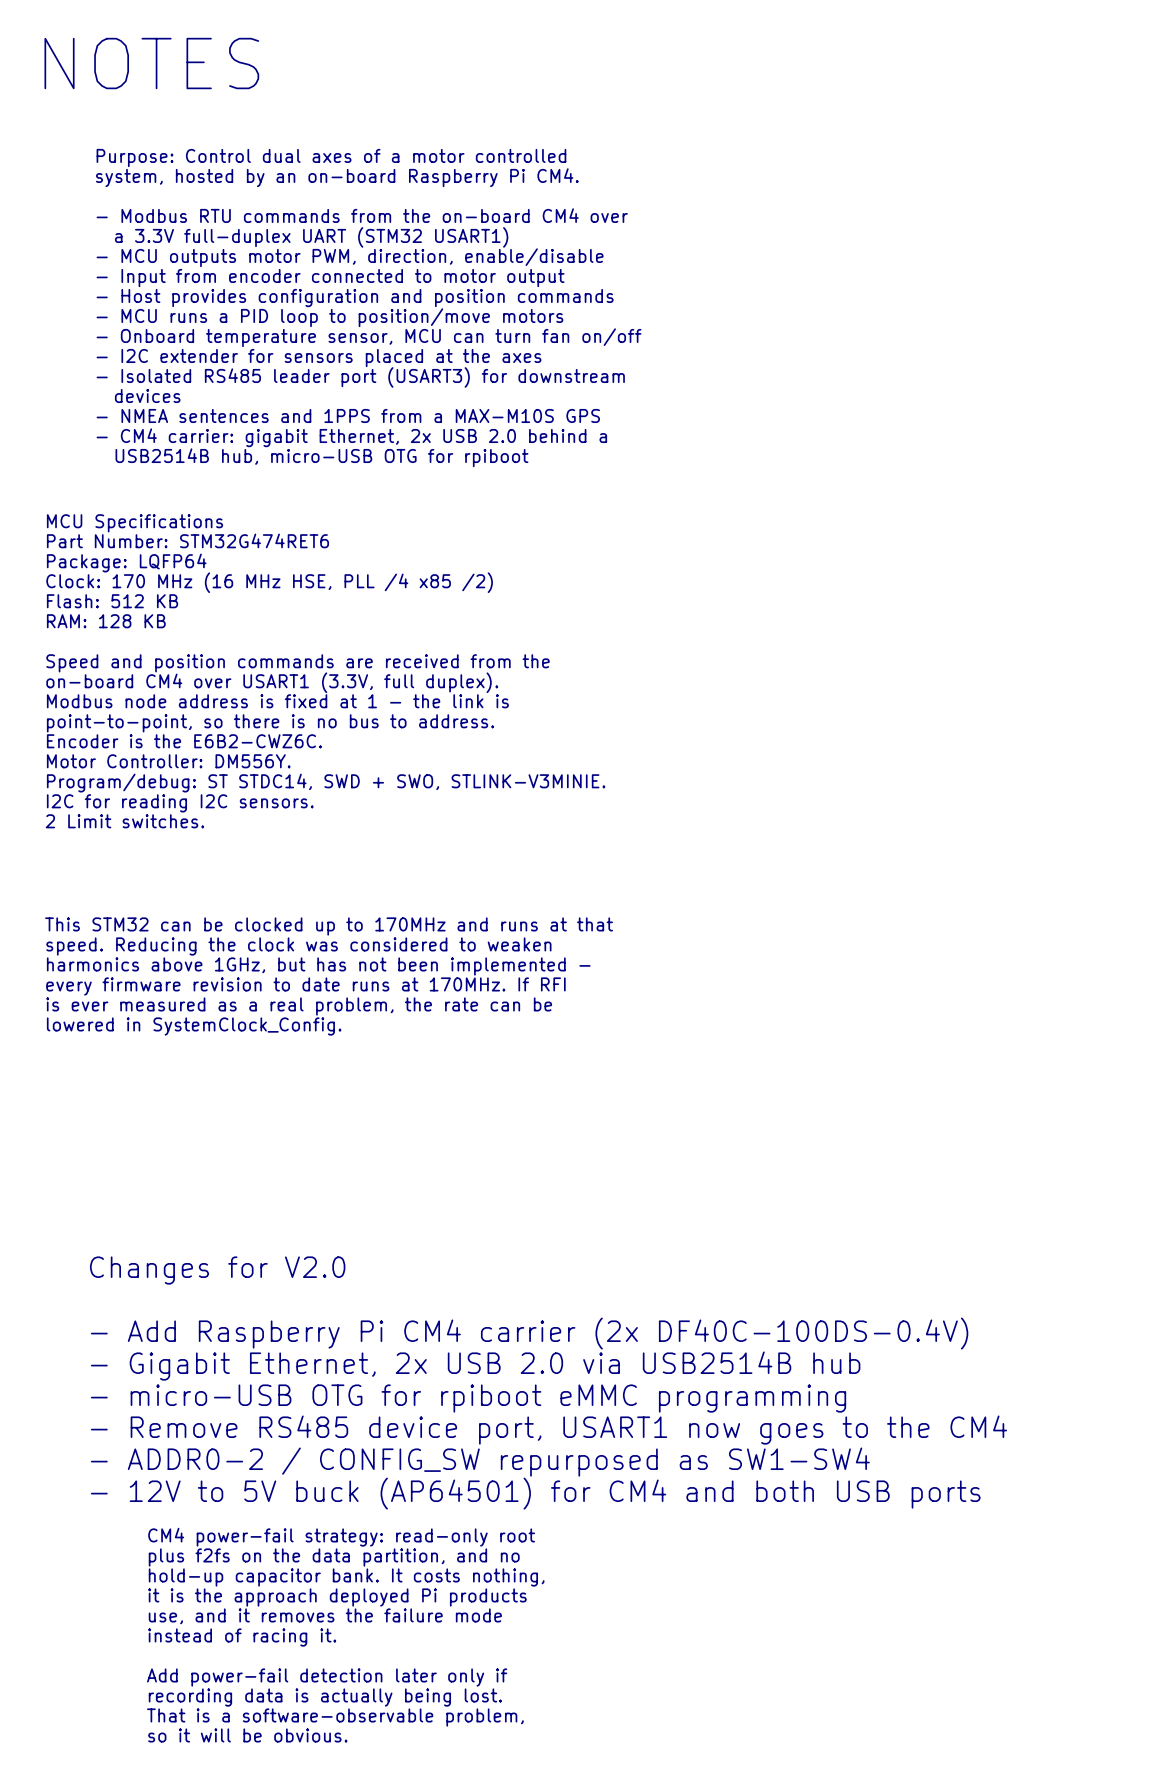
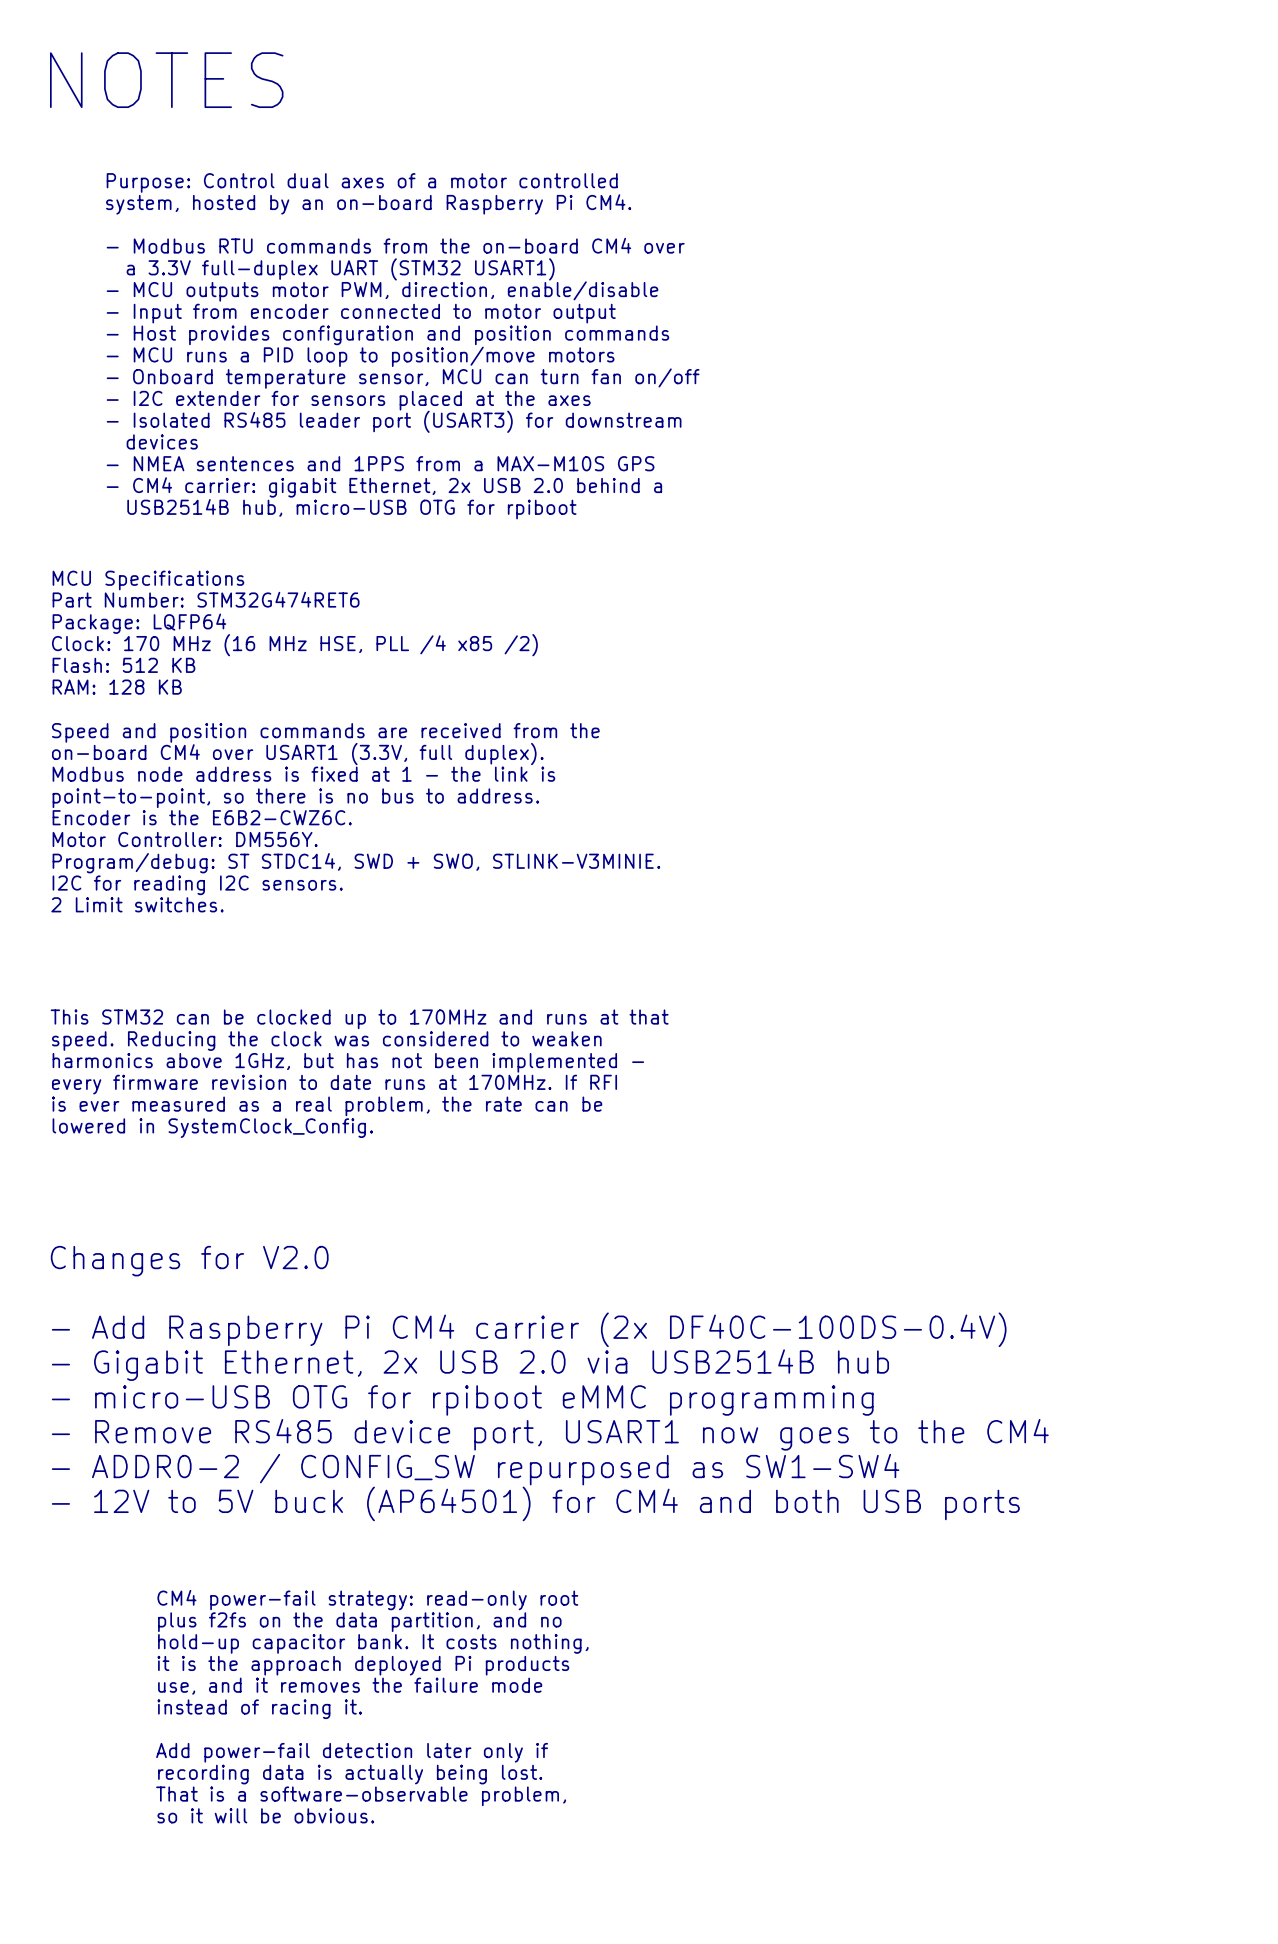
text position: Changes for V2.0 (217, 1270) -> Changes for V2.0 (189, 1261)
text position: - Add Raspberry Pi CM4 carrier (2x DF40C-100DS-0.4V) (529, 1333) -> - Add Raspberry Pi CM4 carrier (2x DF40C-100DS-0.4V) (529, 1329)
text position: - Gigabit Ethernet, 2x USB 2.0 via USB2514B hub (475, 1366) -> - Gigabit Ethernet, 2x USB 2.0 via USB2514B hub (470, 1365)
text position: - micro-USB OTG for rpiboot eMMC programming (468, 1398) -> - micro-USB OTG for rpiboot eMMC programming (462, 1400)
text position: - Remove RS485 device port, USART1 now goes to the CM4 (548, 1430) -> - Remove RS485 device port, USART1 now goes to the CM4 (550, 1434)
text position: - ADDR0-2 / CONFIG_SW repurposed as SW1-SW4 (480, 1462) -> - ADDR0-2 / CONFIG_SW repurposed as SW1-SW4 (475, 1469)
text position: - 12V to 5V buck (AP64501) for CM4 and both USB ports (535, 1493) -> - 12V to 5V buck (AP64501) for CM4 and both USB ports (535, 1503)
text position: CM4 power-fail strategy: read-only root (341, 1537) -> CM4 power-fail strategy: read-only root (367, 1600)
text position: plus f2fs on the data partition, and no (334, 1557) -> plus f2fs on the data partition, and no (359, 1622)
text position: hold-up capacitor bank. It costs nothing, (346, 1577) -> hold-up capacitor bank. It costs nothing, (373, 1643)
text position: it is the approach deployed Pi products (337, 1597) -> it is the approach deployed Pi products (363, 1665)
text position: use, and it removes the failure mode (325, 1616) -> use, and it removes the failure mode (350, 1686)
text position: instead of racing it. (242, 1637) -> instead of racing it. (259, 1709)
text position: Add power-fail detection later only if (327, 1677) -> Add power-fail detection later only if (352, 1752)
text position: recording data is actually being lost. (325, 1697) -> recording data is actually being lost. (350, 1774)
text position: That is a software-observable problem, (335, 1717) -> That is a software-observable problem, (361, 1796)
text position: so it will be obvious. (247, 1735) -> so it will be obvious. (265, 1815)

